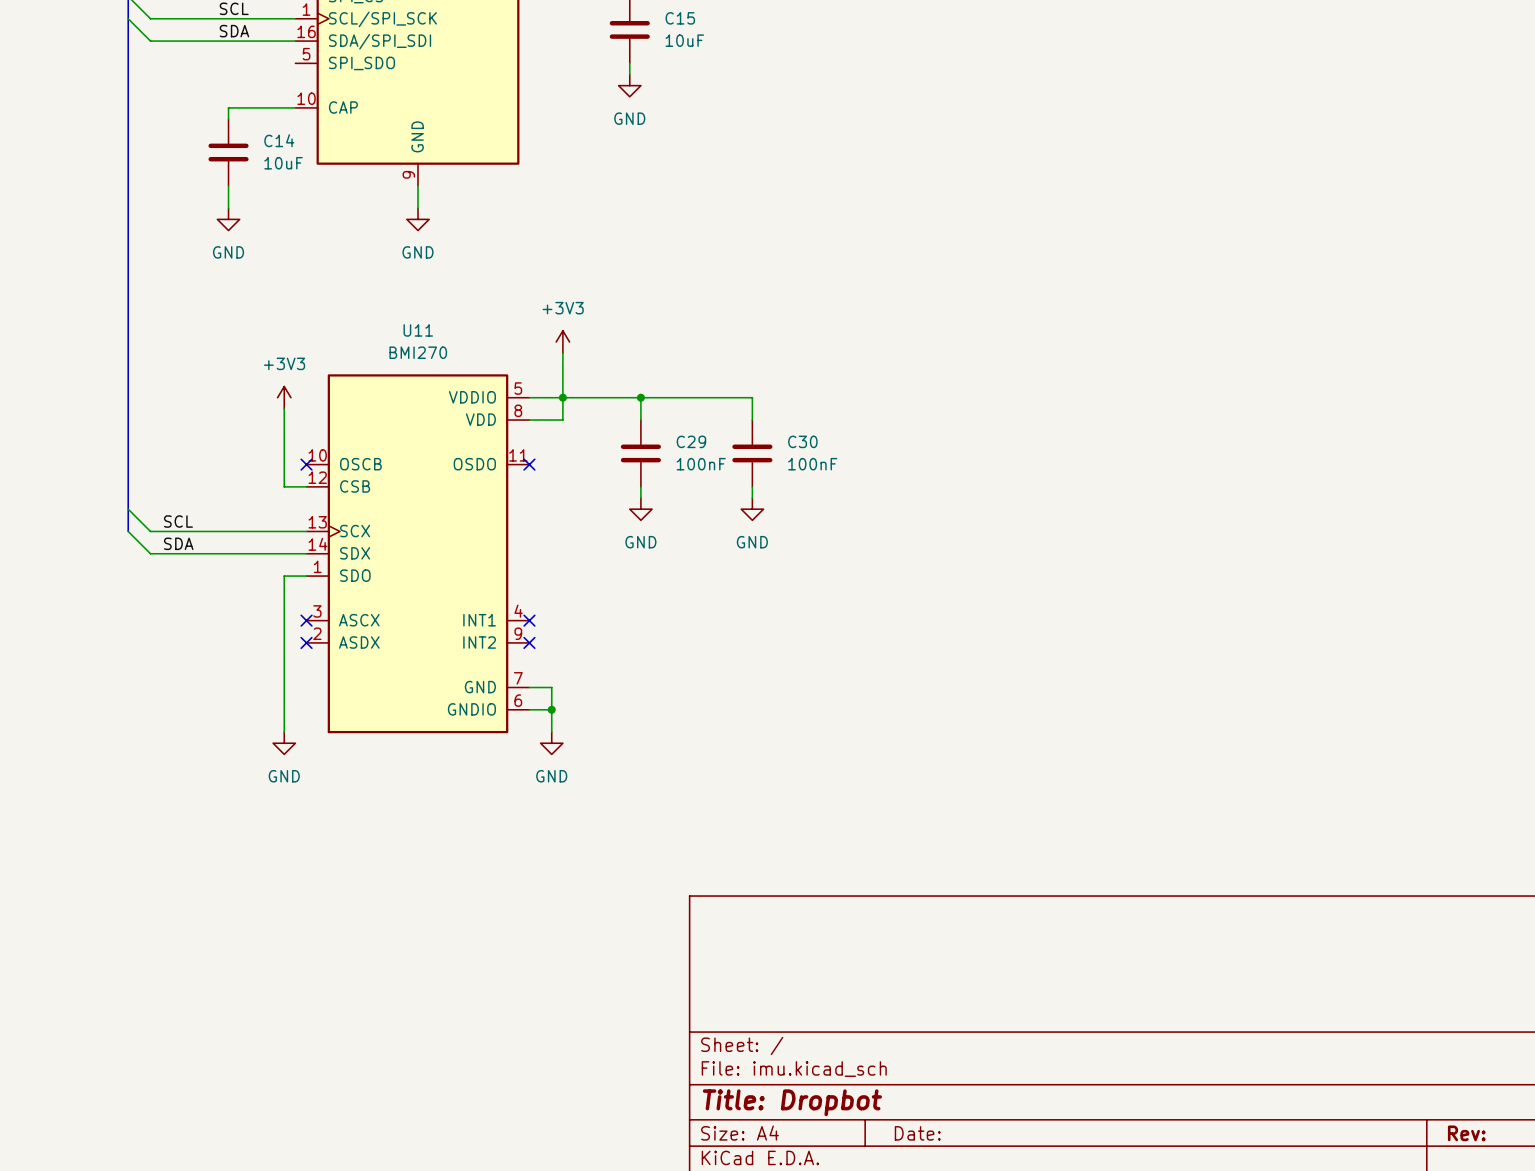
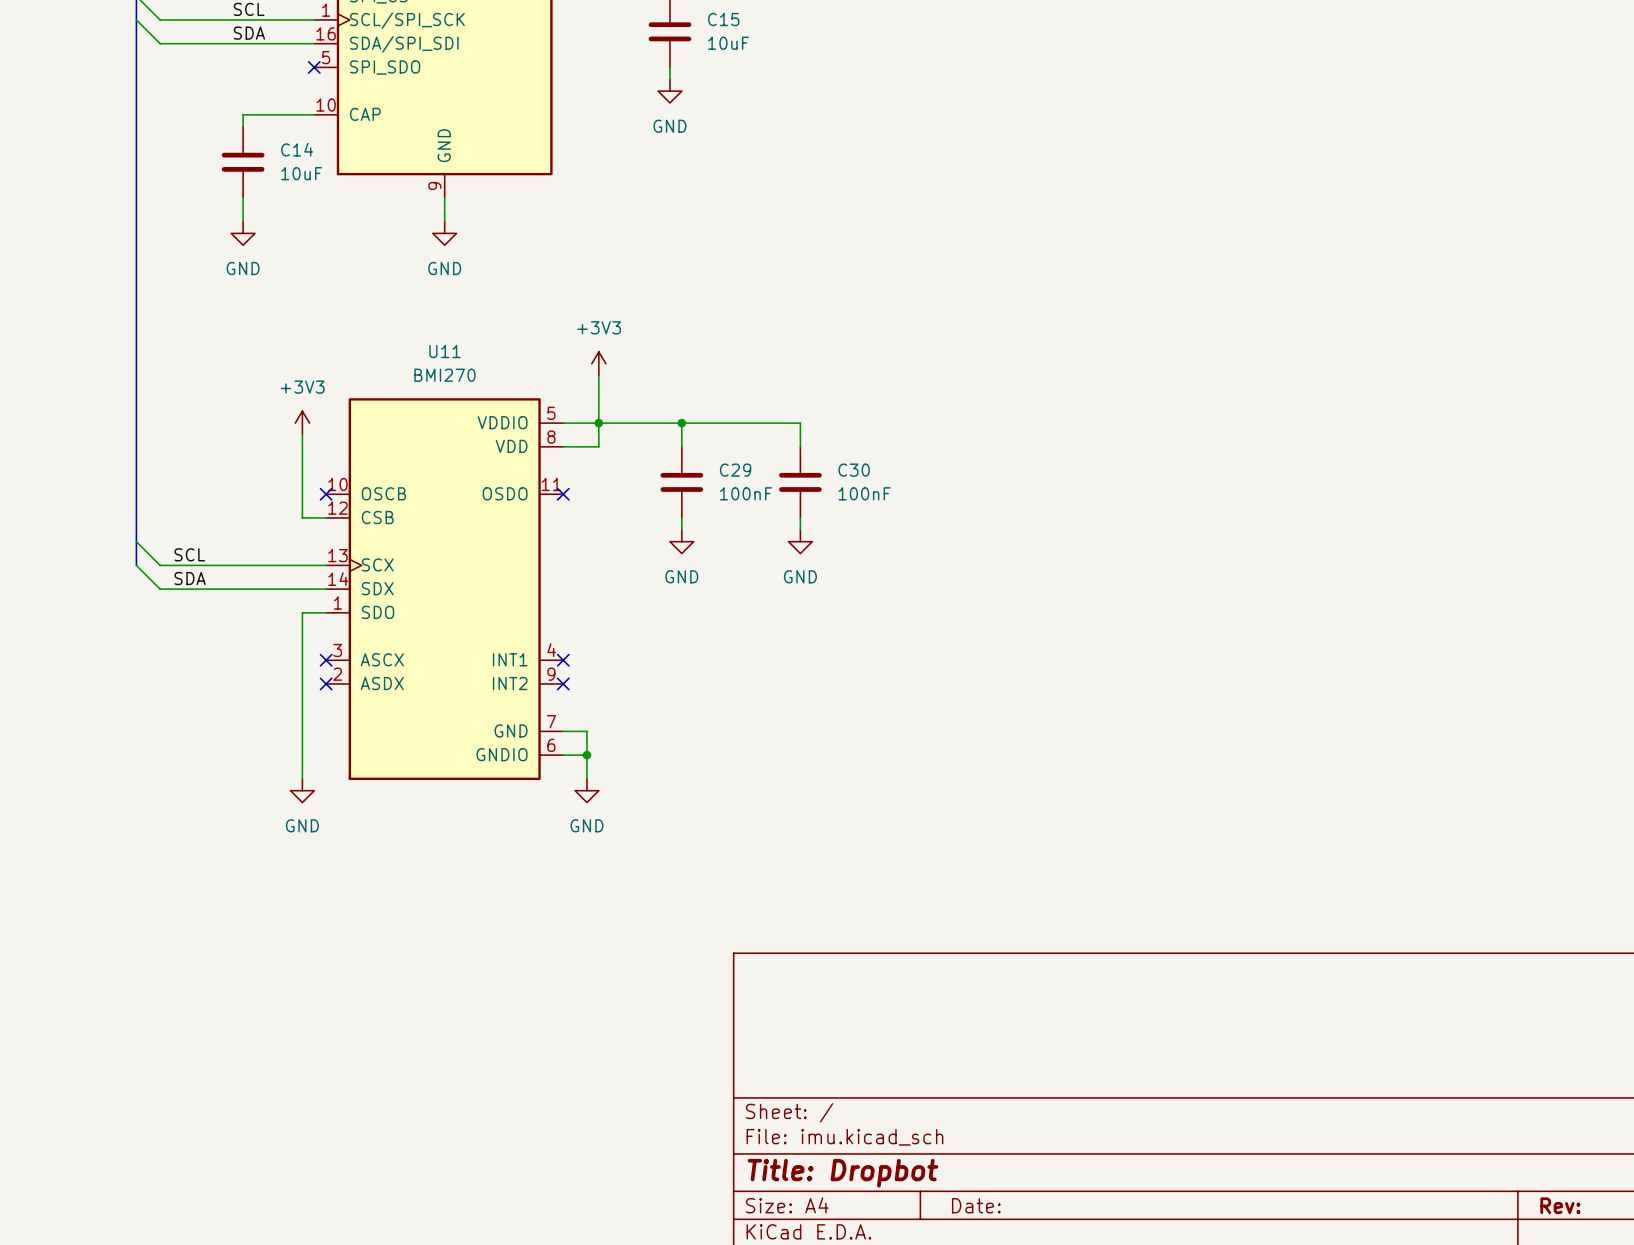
no-connect mark: none -> (314, 67)

